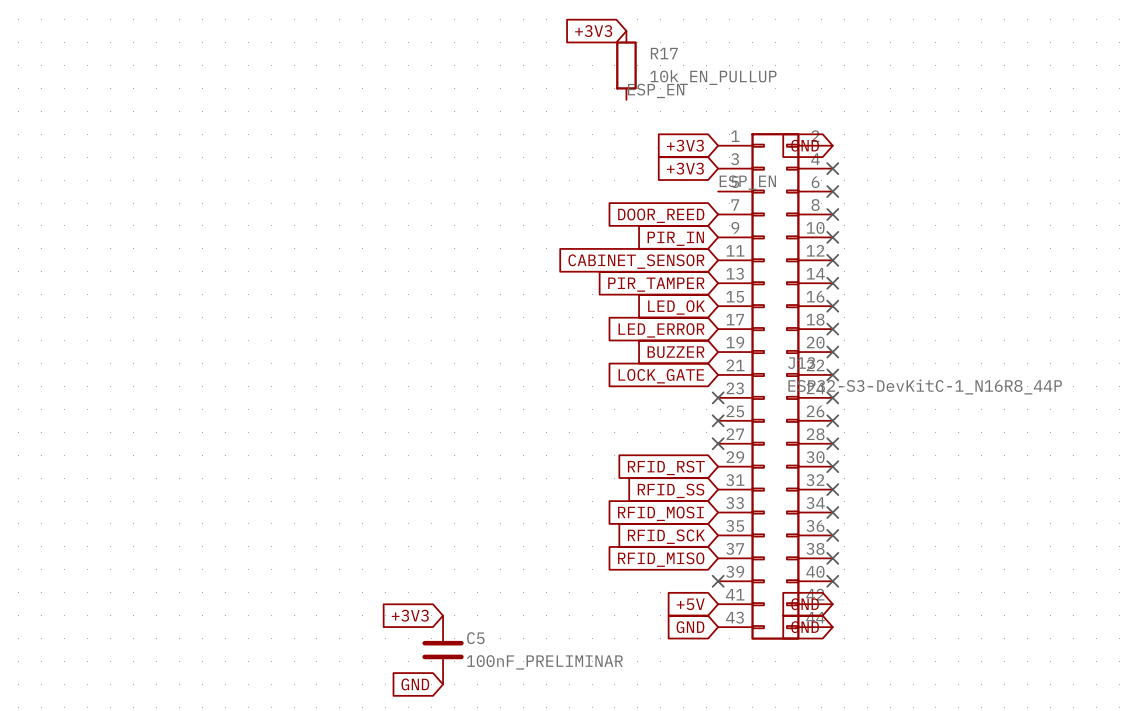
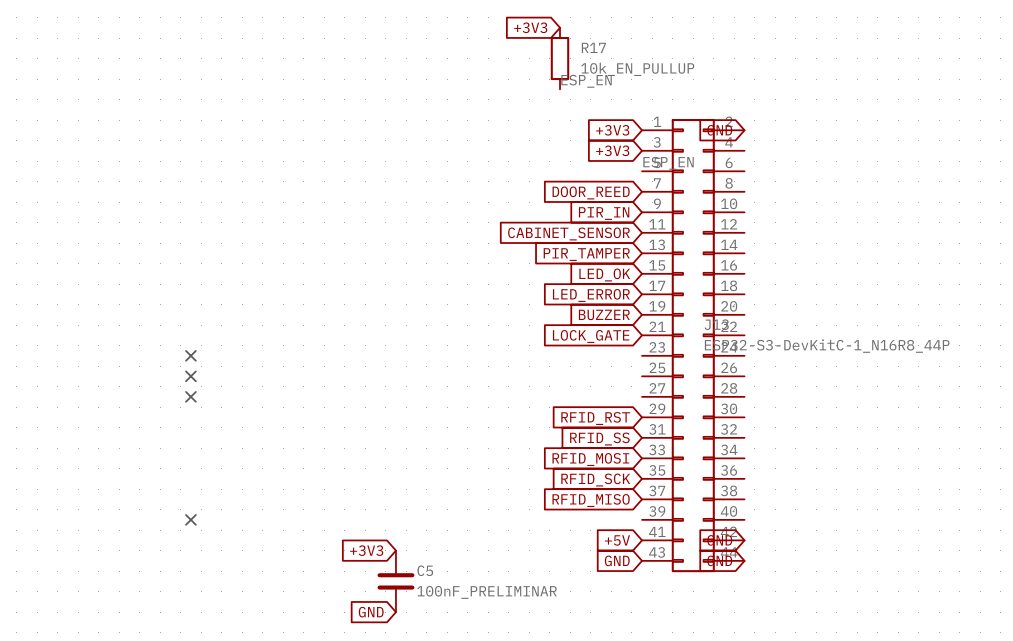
no-connect mark: (832, 168) -> none
no-connect mark: (832, 191) -> none
no-connect mark: (832, 214) -> none
no-connect mark: (832, 237) -> none
no-connect mark: (832, 260) -> none
no-connect mark: (832, 283) -> none
no-connect mark: (832, 306) -> none
no-connect mark: (832, 329) -> none
no-connect mark: (832, 352) -> none
no-connect mark: (832, 374) -> none
no-connect mark: none -> (190, 355)
no-connect mark: (718, 397) -> none
no-connect mark: (832, 397) -> none
no-connect mark: none -> (190, 376)
no-connect mark: (718, 420) -> none
no-connect mark: (832, 420) -> none
no-connect mark: none -> (190, 396)
no-connect mark: (718, 443) -> none
no-connect mark: (832, 443) -> none
no-connect mark: (832, 466) -> none
no-connect mark: (832, 489) -> none
no-connect mark: (832, 512) -> none
no-connect mark: (832, 535) -> none
no-connect mark: (832, 558) -> none
no-connect mark: none -> (190, 519)
no-connect mark: (718, 581) -> none
no-connect mark: (832, 581) -> none

